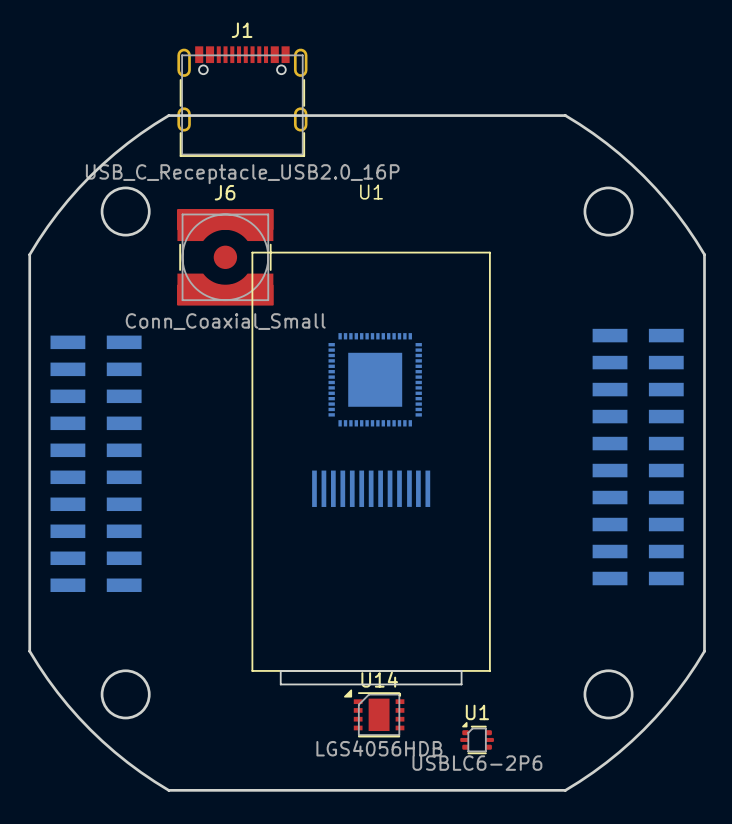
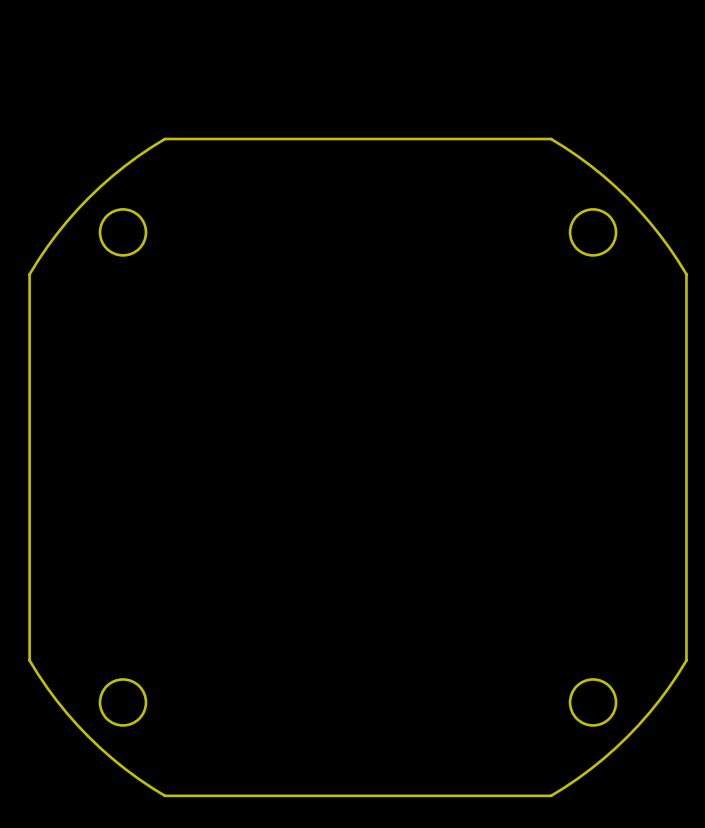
J1: USB_C_Receptacle_USB2.0_16P (242, 101) -> none
J6: Conn_Coaxial_Small (225, 257) -> none
part: (375, 379) -> none
part: (638, 457) -> none
part: (96, 463) -> none
U1: (371, 468) -> none
U14: LGS4056HDB (374, 713) -> none
U1: USBLC6-2P6 (477, 738) -> none

